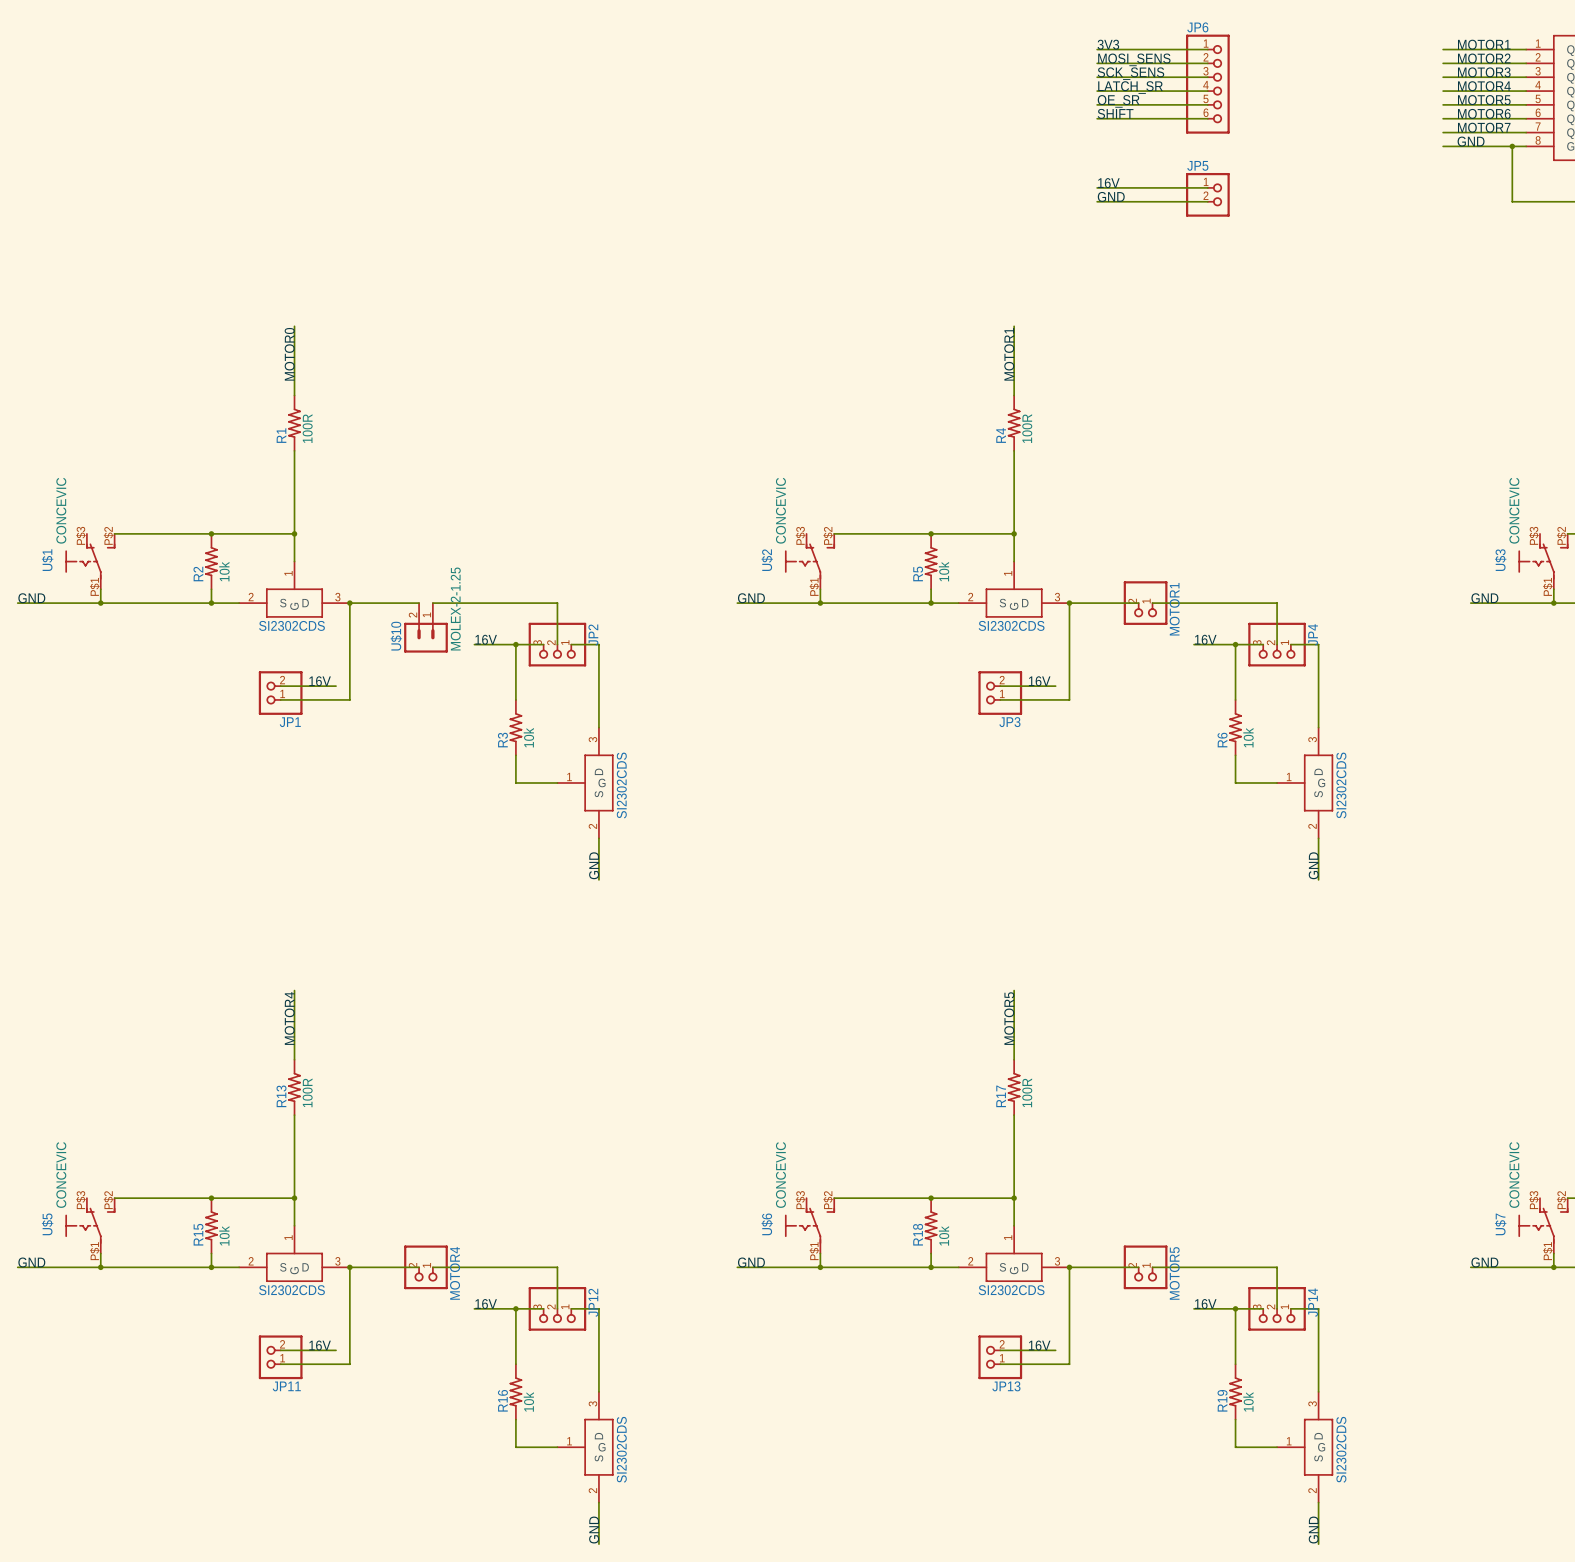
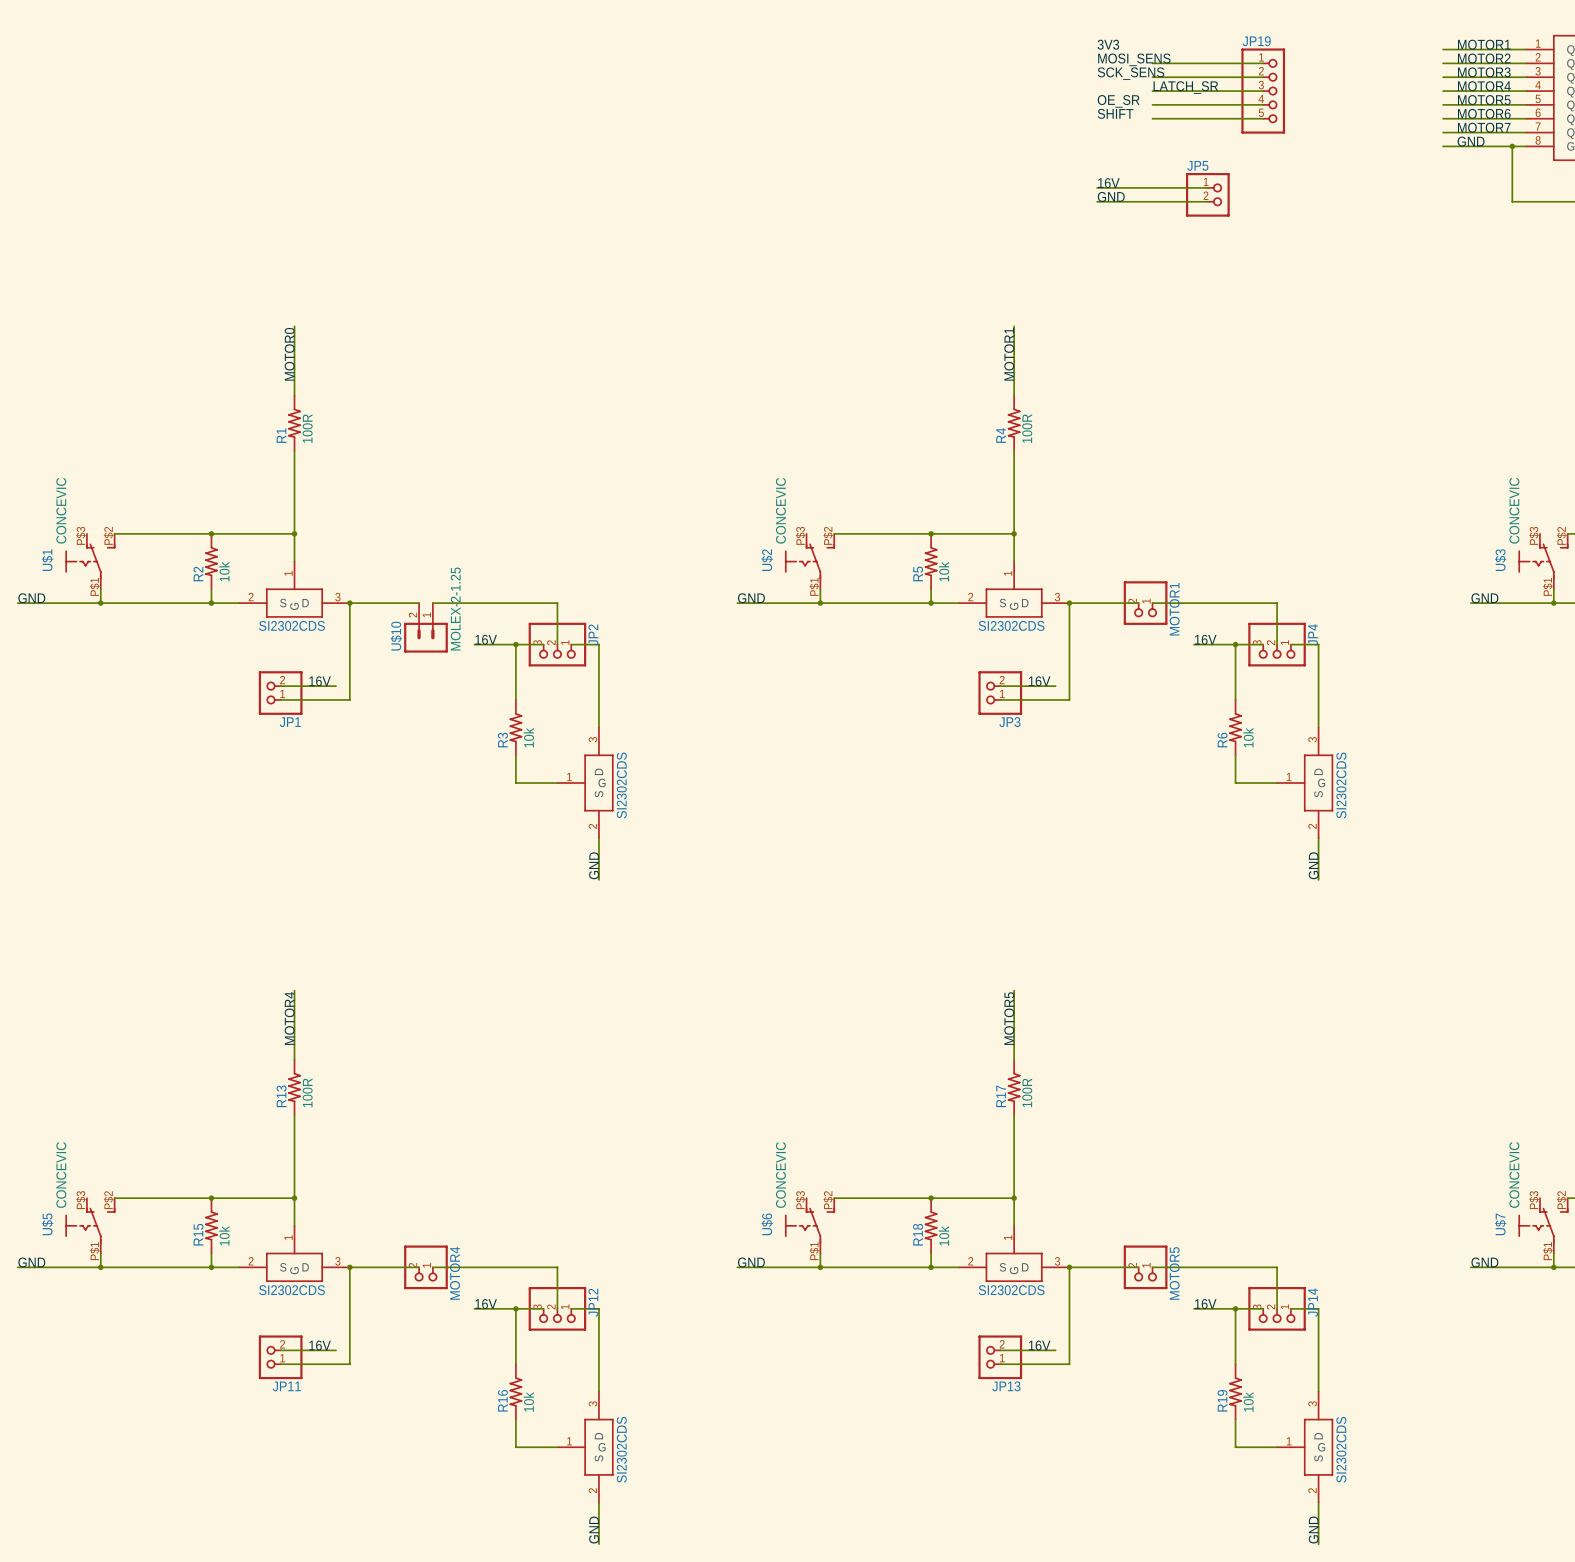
wire: (1097, 49) (1207, 49) -> none
wire: (1097, 63) (1152, 63) -> (1207, 63) (1263, 63)
wire: (1097, 77) (1152, 77) -> (1207, 77) (1263, 77)
JP6: (1207, 84) -> none
label position: LATCH_SR (1130, 87) -> LATCH_SR (1185, 87)
wire: (1097, 91) (1152, 91) -> (1207, 91) (1263, 91)
JP19: none -> (1263, 91)
wire: (1097, 104) (1152, 104) -> (1207, 104) (1263, 104)
wire: (1097, 118) (1152, 118) -> (1207, 118) (1263, 118)

